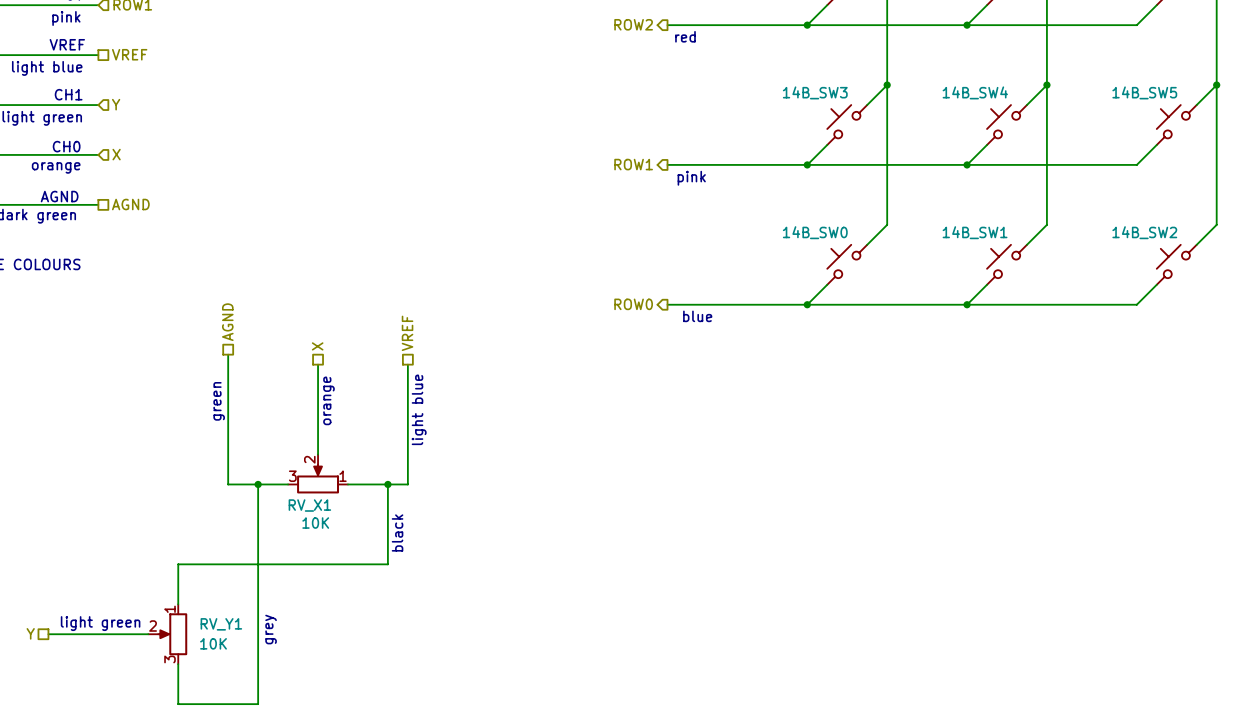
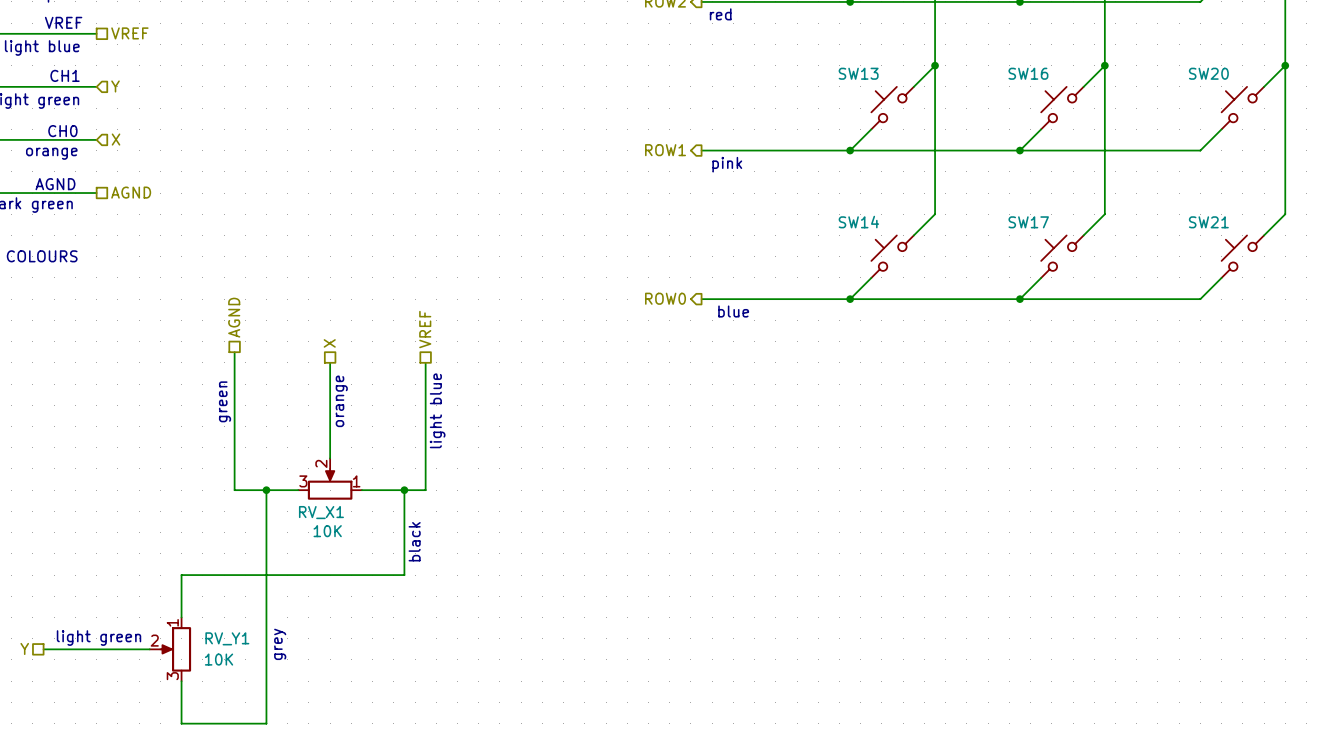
14B_SW3 name: 14B_SW3 (815, 92) -> SW13 (858, 73)
14B_SW4 name: 14B_SW4 (975, 92) -> SW16 (1028, 73)
14B_SW5 name: 14B_SW5 (1144, 92) -> SW20 (1208, 73)
14B_SW0 name: 14B_SW0 (815, 232) -> SW14 (858, 222)
14B_SW1 name: 14B_SW1 (975, 232) -> SW17 (1028, 222)
14B_SW2 name: 14B_SW2 (1144, 232) -> SW21 (1208, 222)

